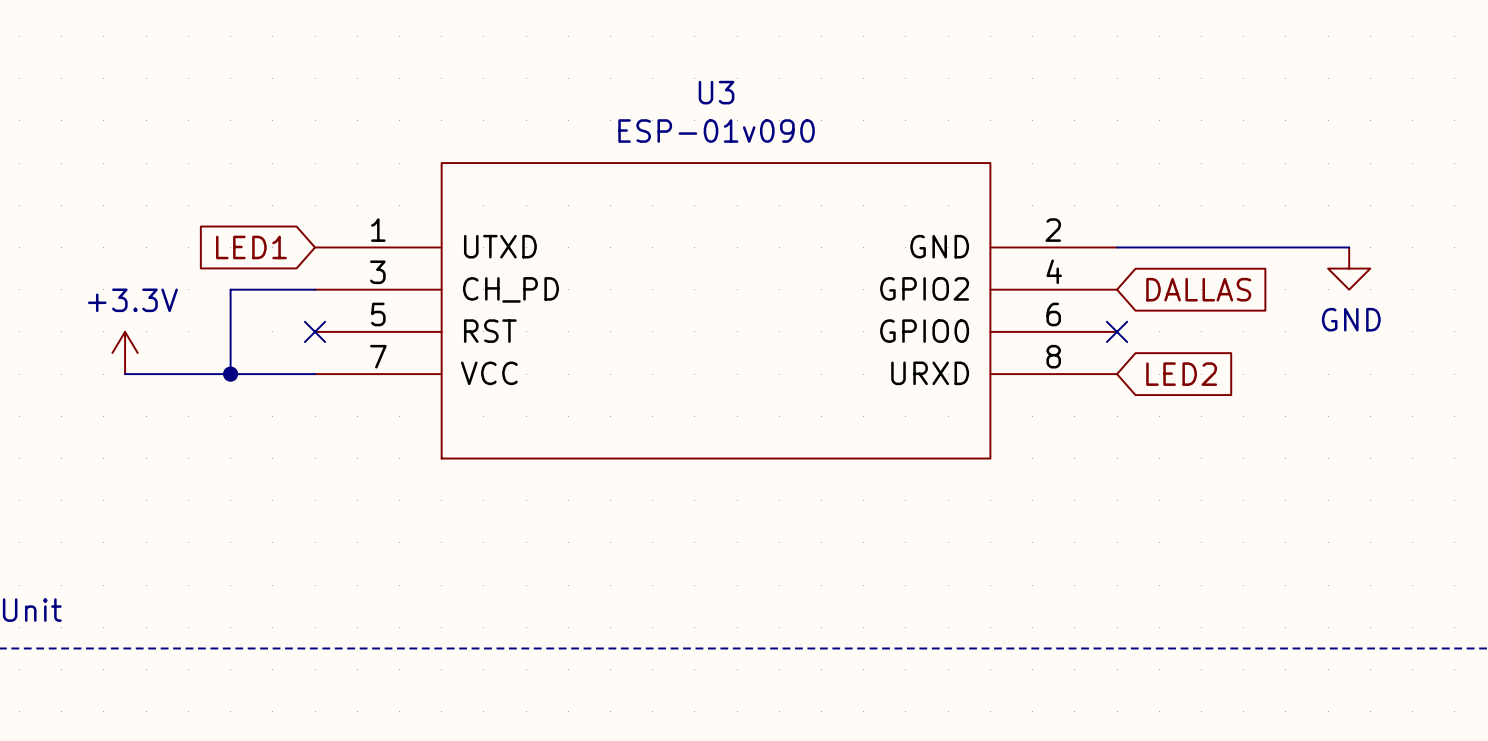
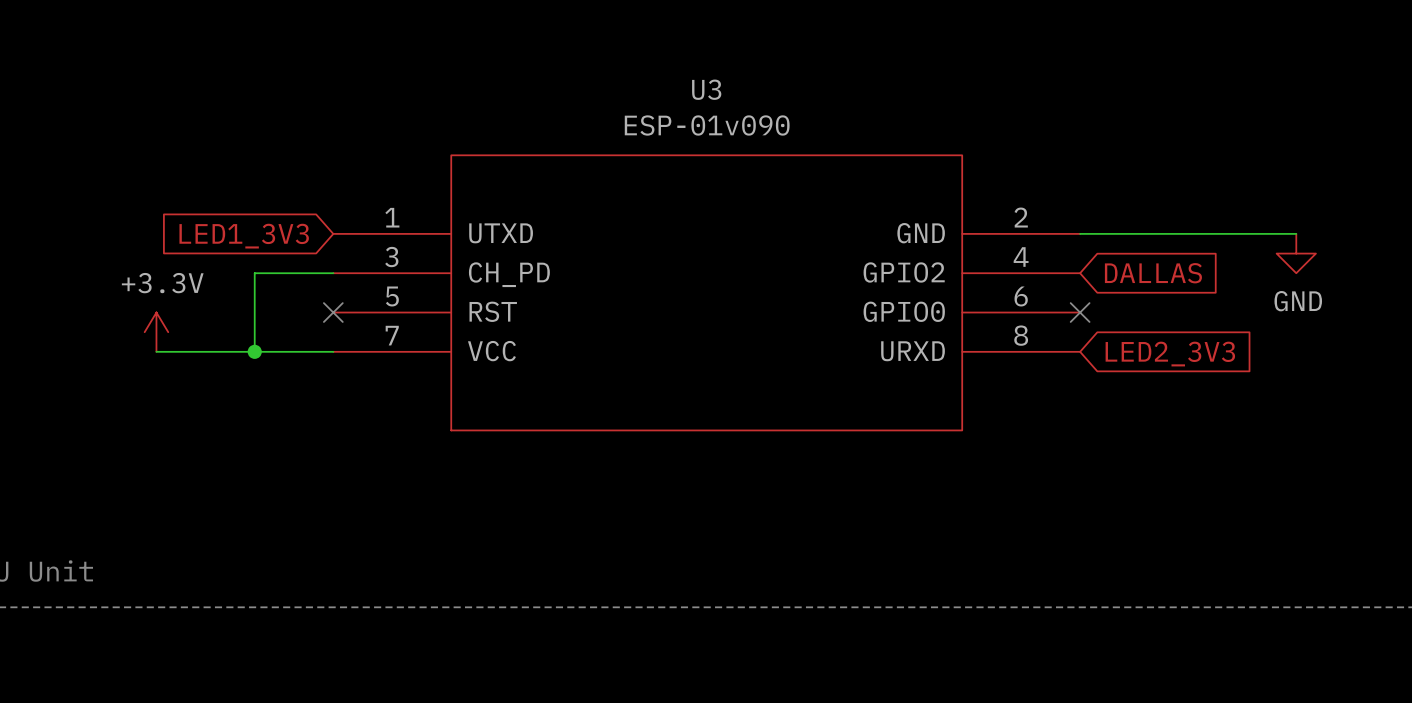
global label: LED1 (251, 247) -> LED1_3V3 (244, 236)
global label: LED2 (1181, 374) -> LED2_3V3 (1170, 354)

